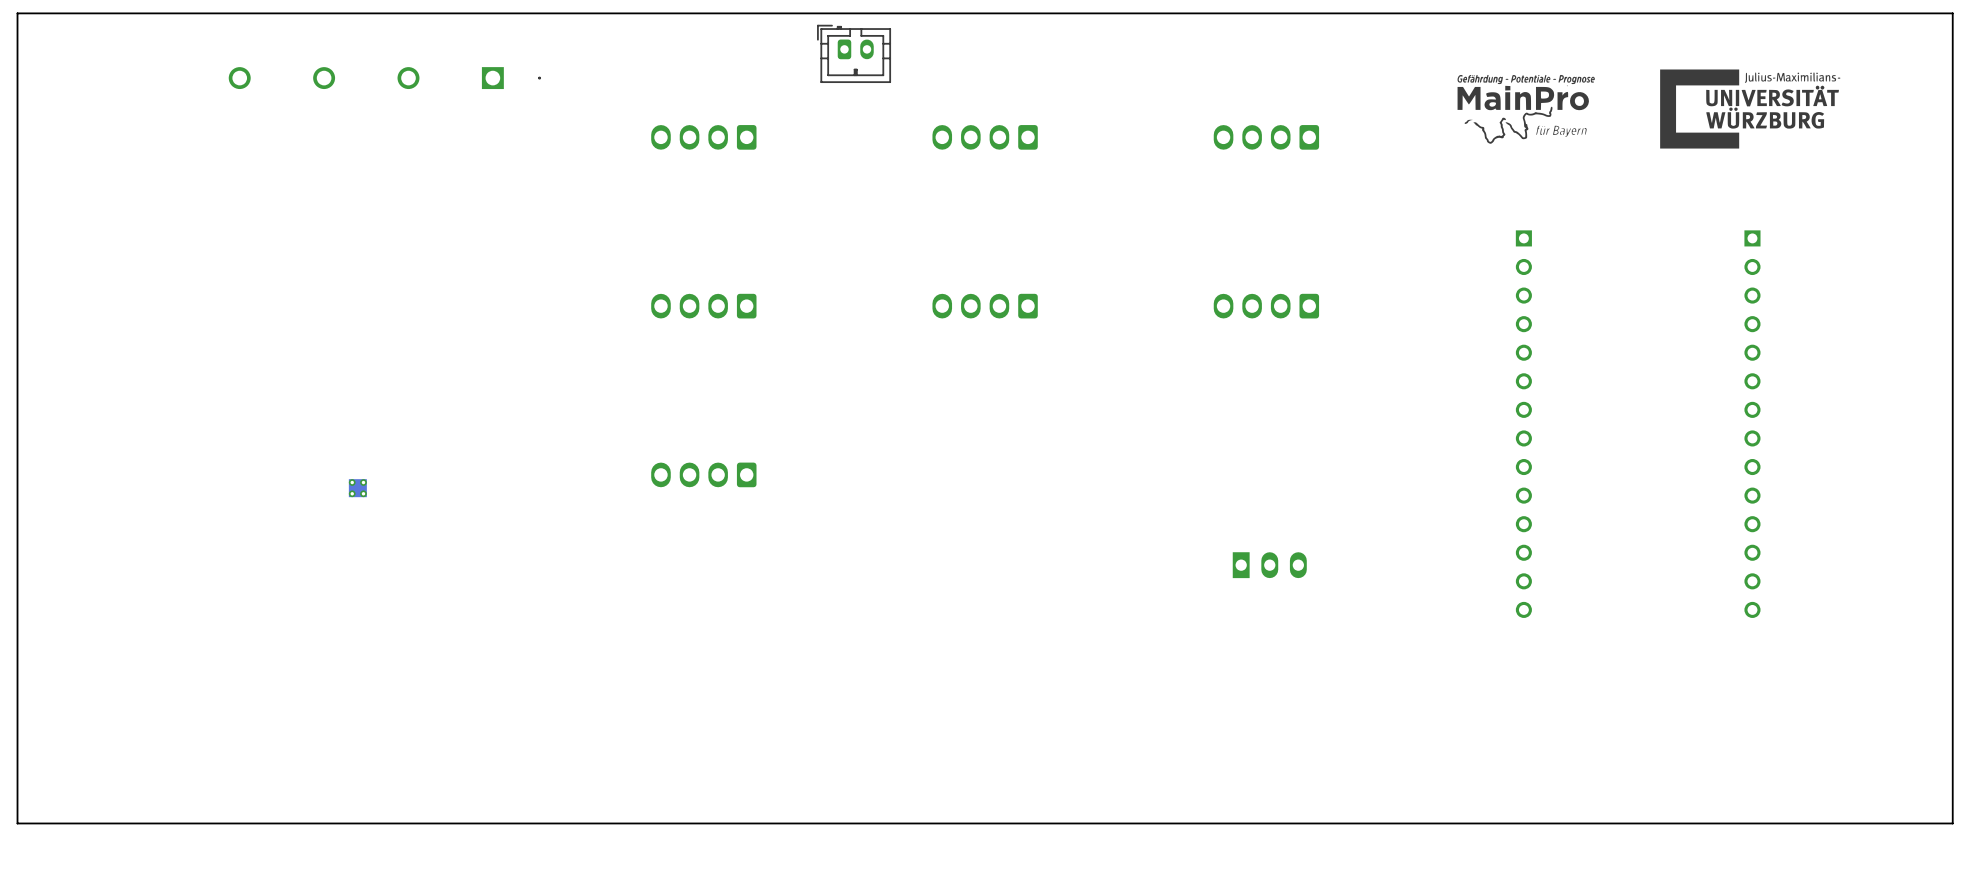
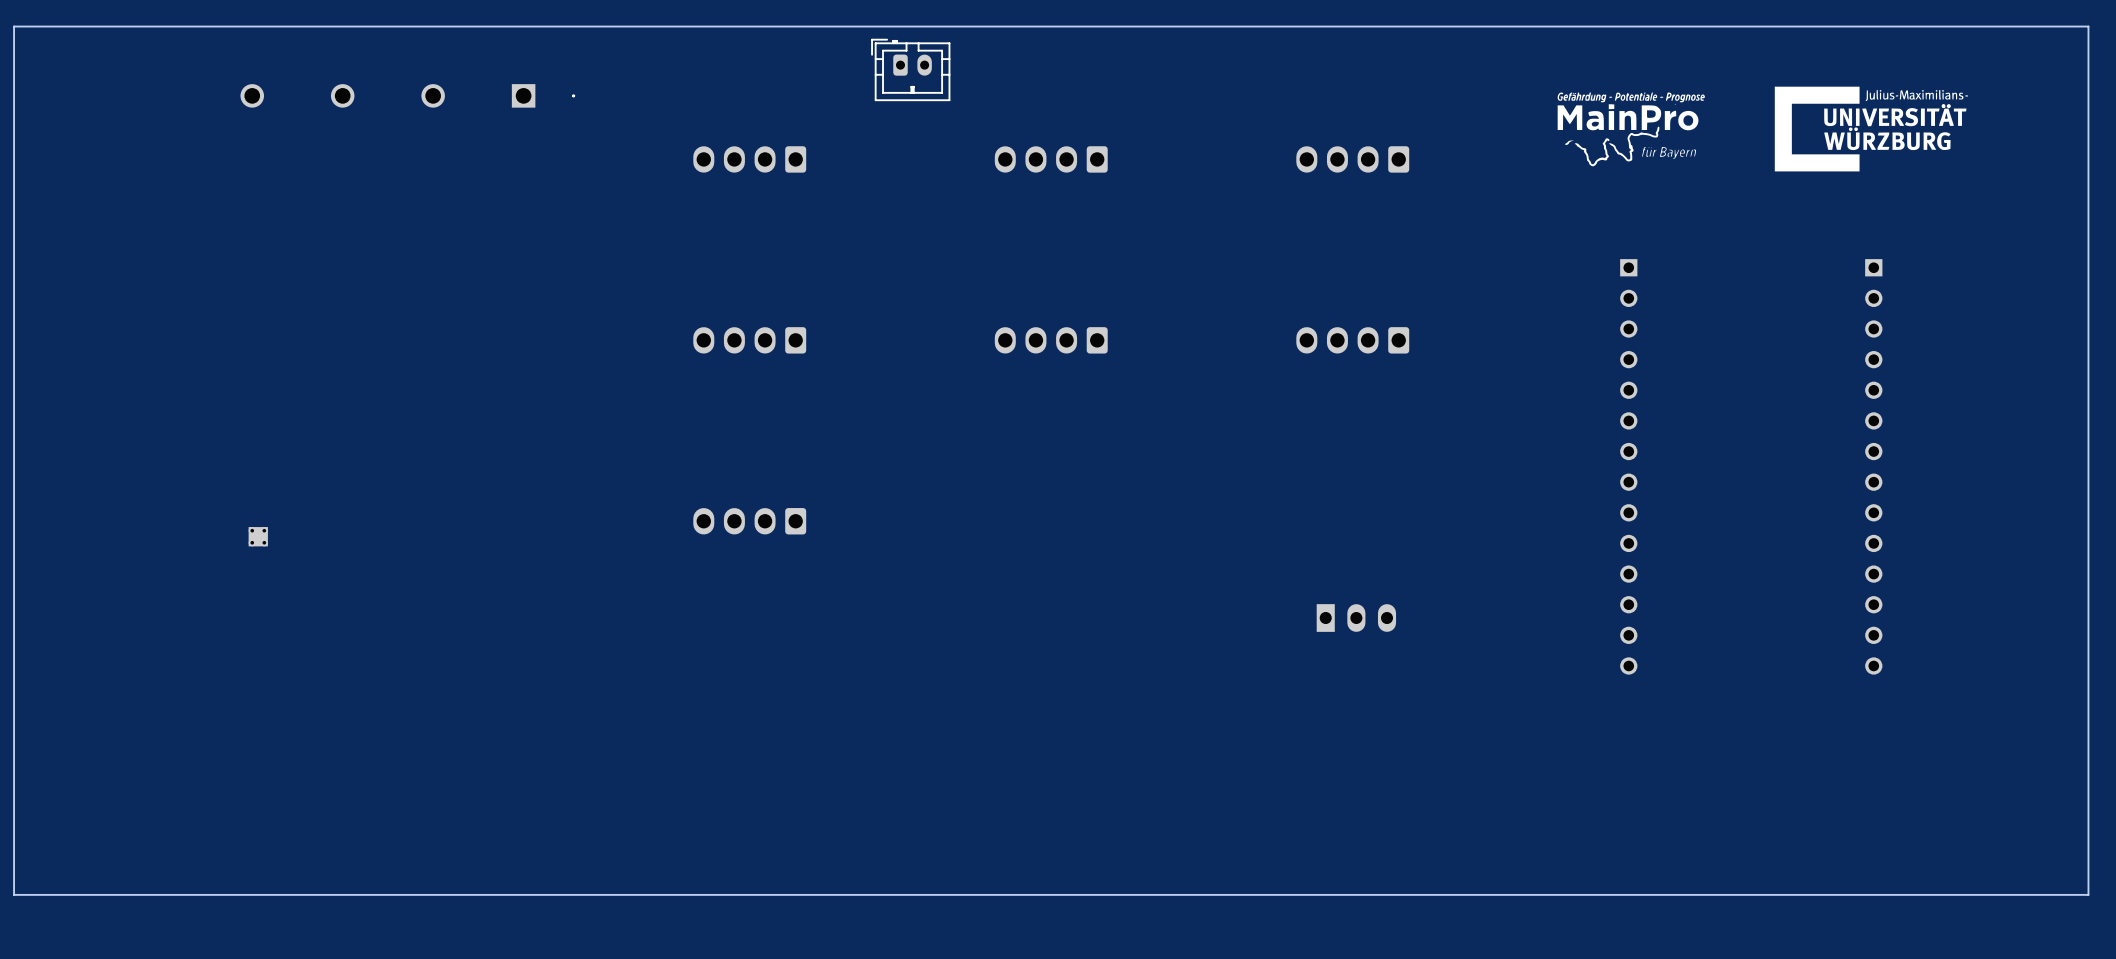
part position: (357, 488) -> (258, 536)

